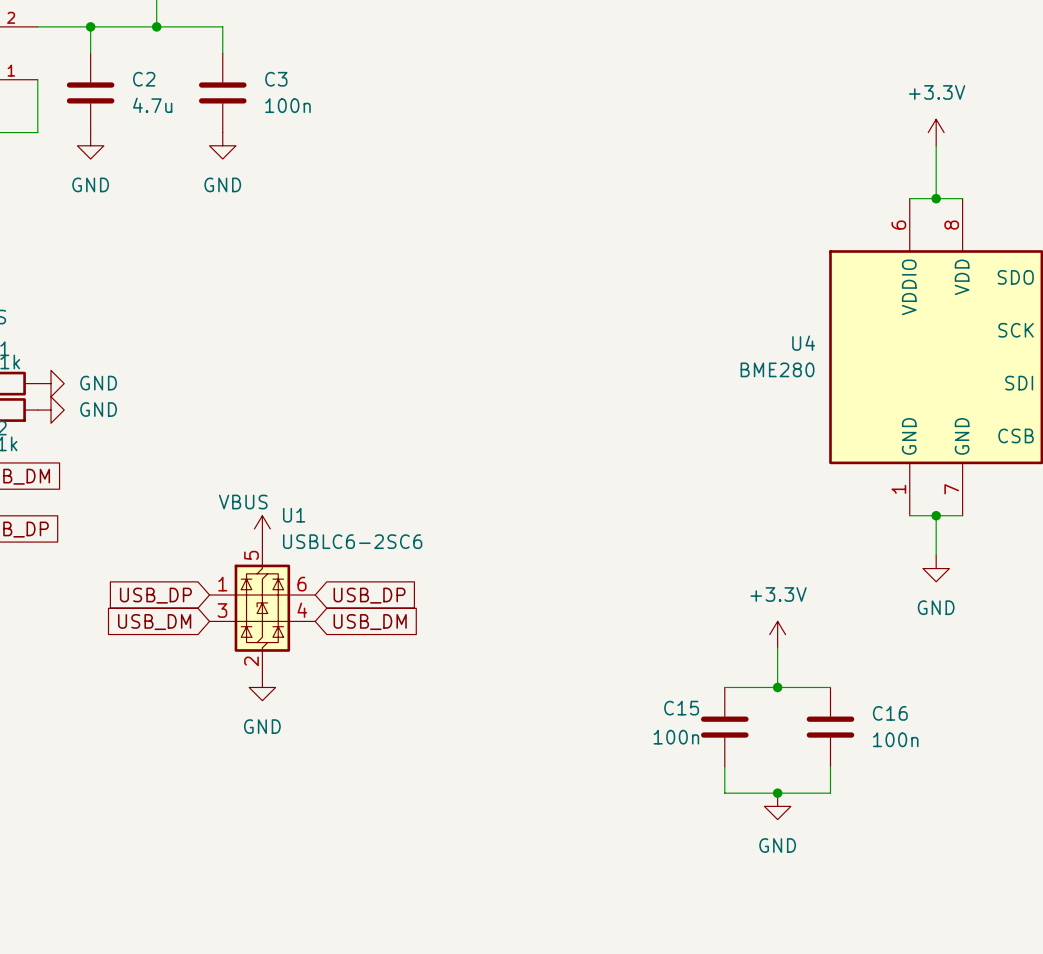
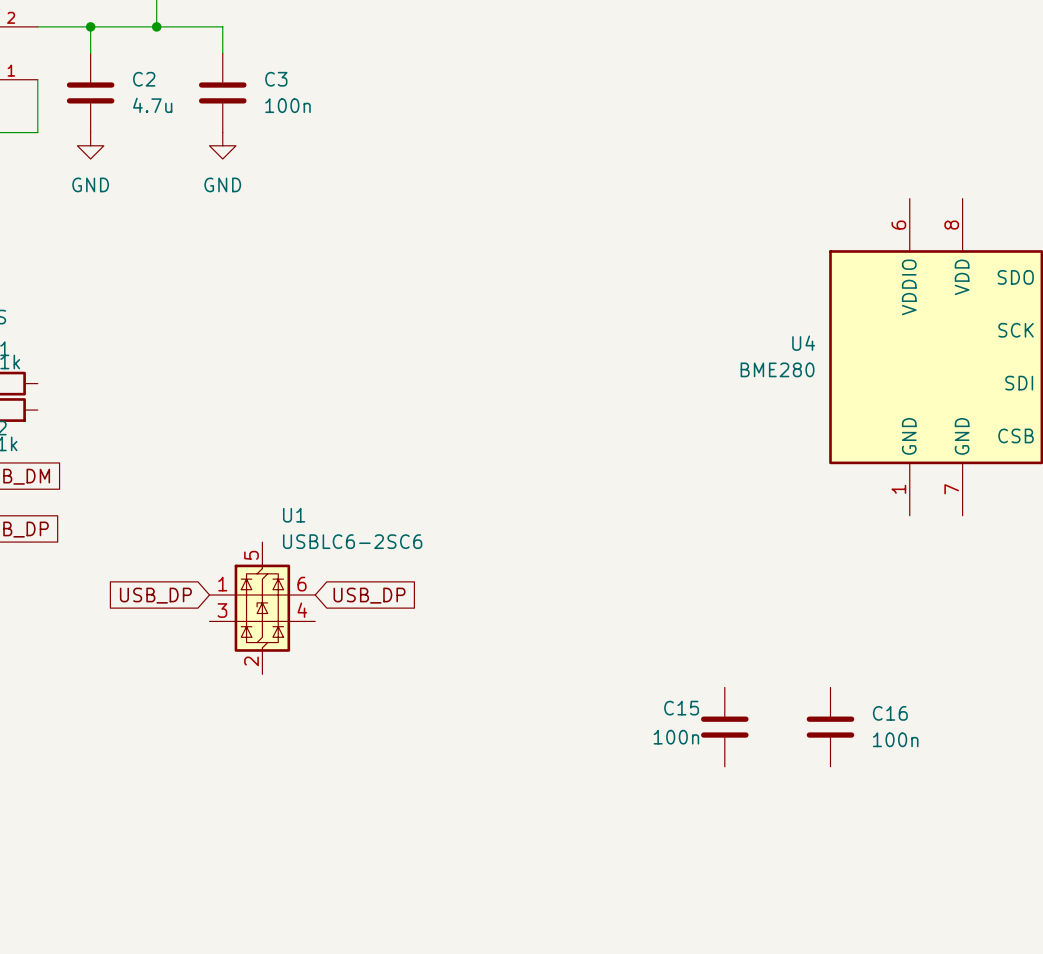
power symbol: +3.3V (936, 132) -> none
wire: (936, 145) (936, 198) -> none
wire: (909, 198) (962, 198) -> none
junction: (936, 198) -> none
power symbol: GND (51, 383) -> none
power symbol: GND (51, 410) -> none
wire: (909, 515) (962, 515) -> none
wire: (936, 515) (936, 555) -> none
junction: (936, 515) -> none
power symbol: VBUS (262, 528) -> none
power symbol: GND (936, 568) -> none
global label: USB_DM (154, 622) -> none
global label: USB_DM (370, 622) -> none
power symbol: +3.3V (777, 634) -> none
wire: (777, 647) (777, 687) -> none
power symbol: GND (262, 687) -> none
wire: (724, 687) (830, 687) -> none
junction: (777, 687) -> none
wire: (724, 766) (724, 793) (830, 793) (830, 766) -> none
junction: (777, 793) -> none
power symbol: GND (777, 806) -> none

